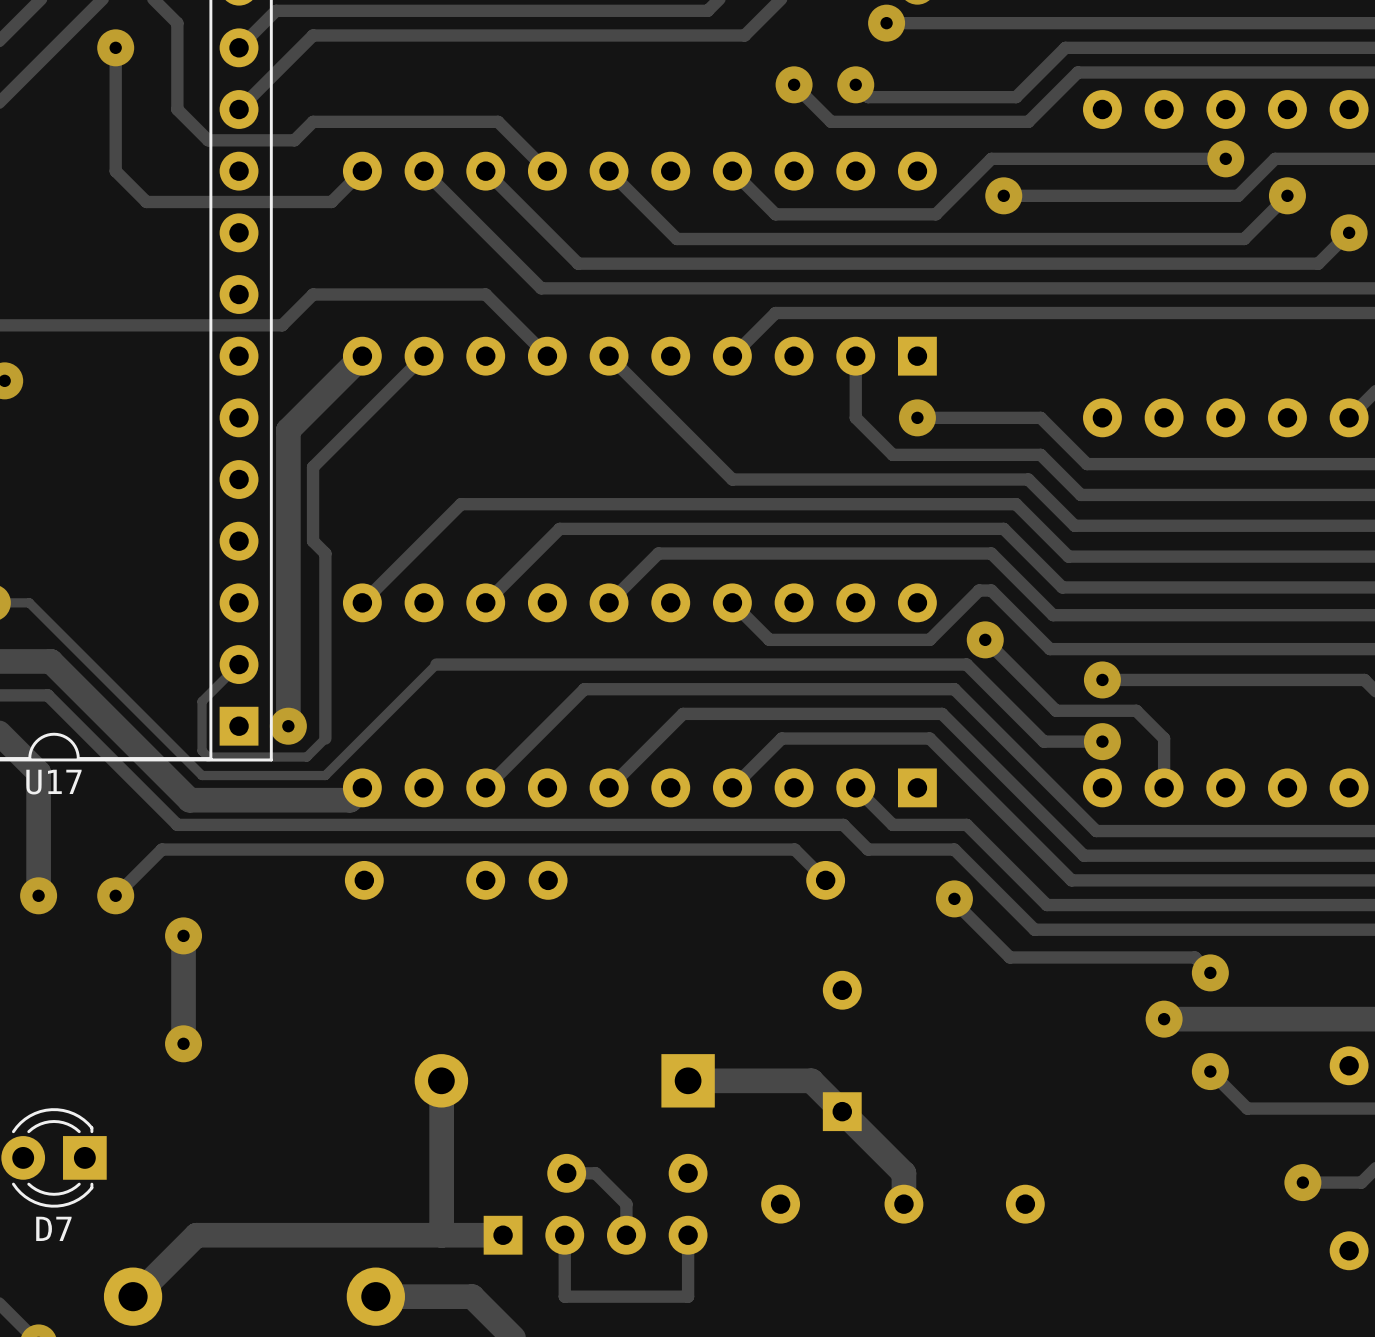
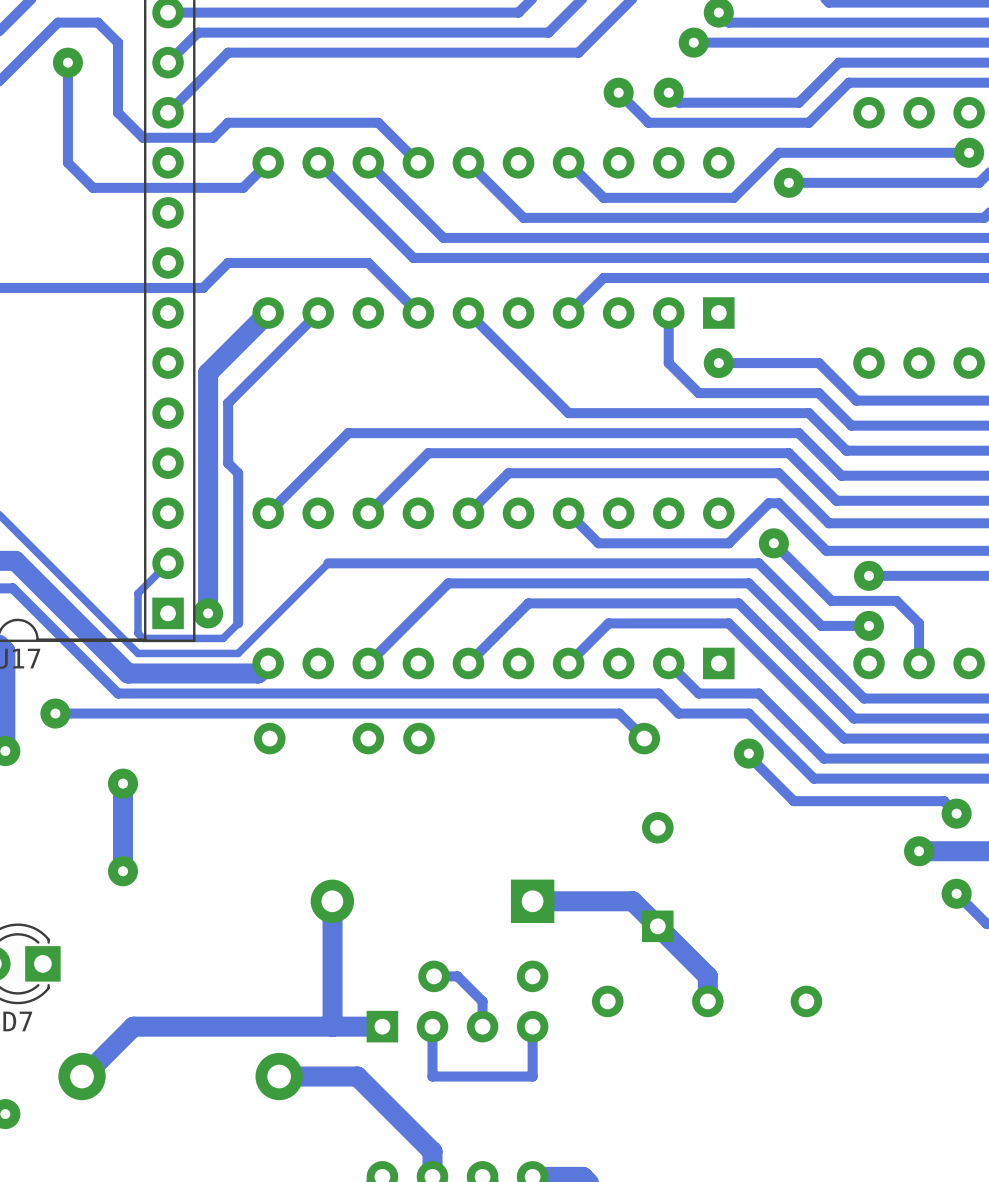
track: (161, 849) (115, 895) -> (105, 713) (55, 713)
via position: (115, 895) -> (55, 713)

